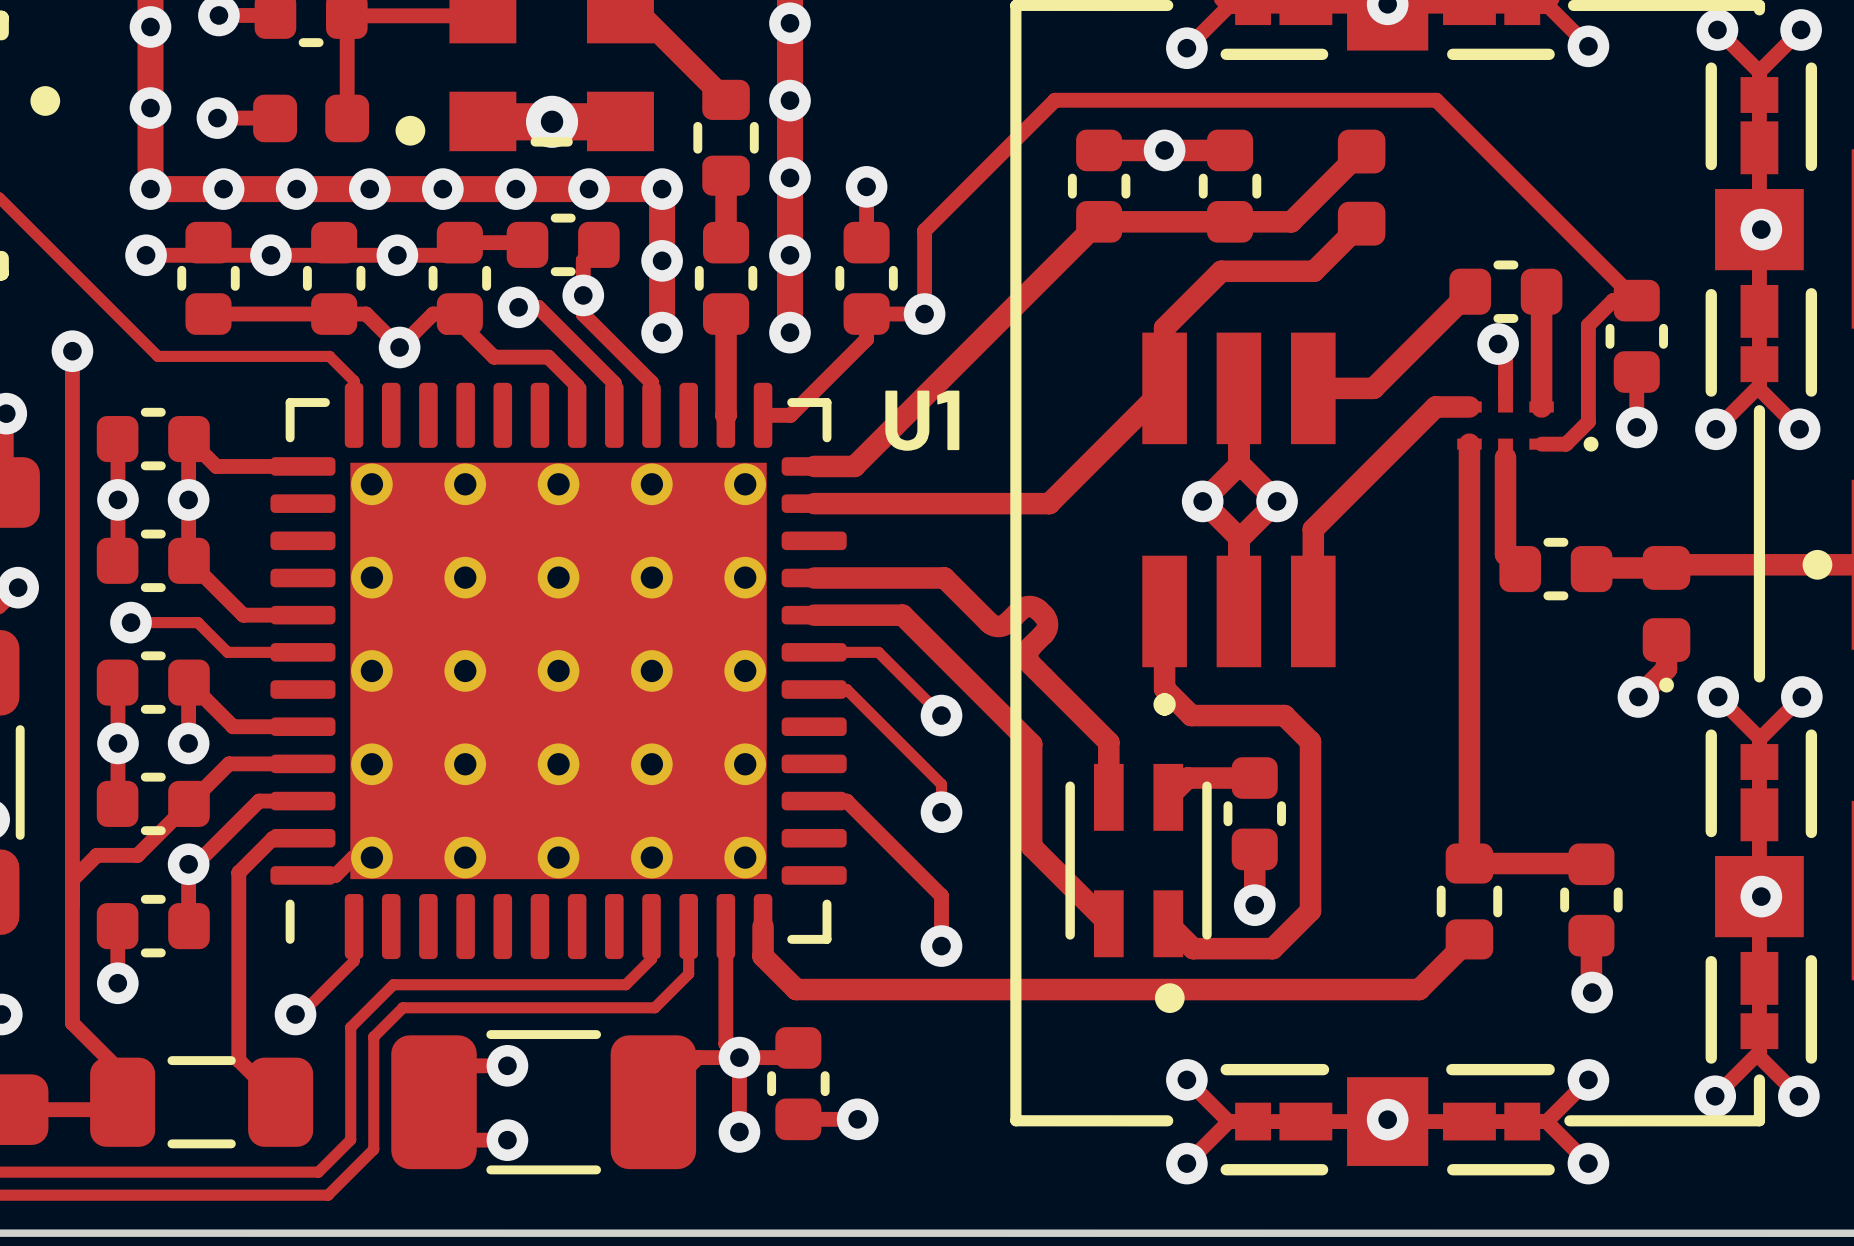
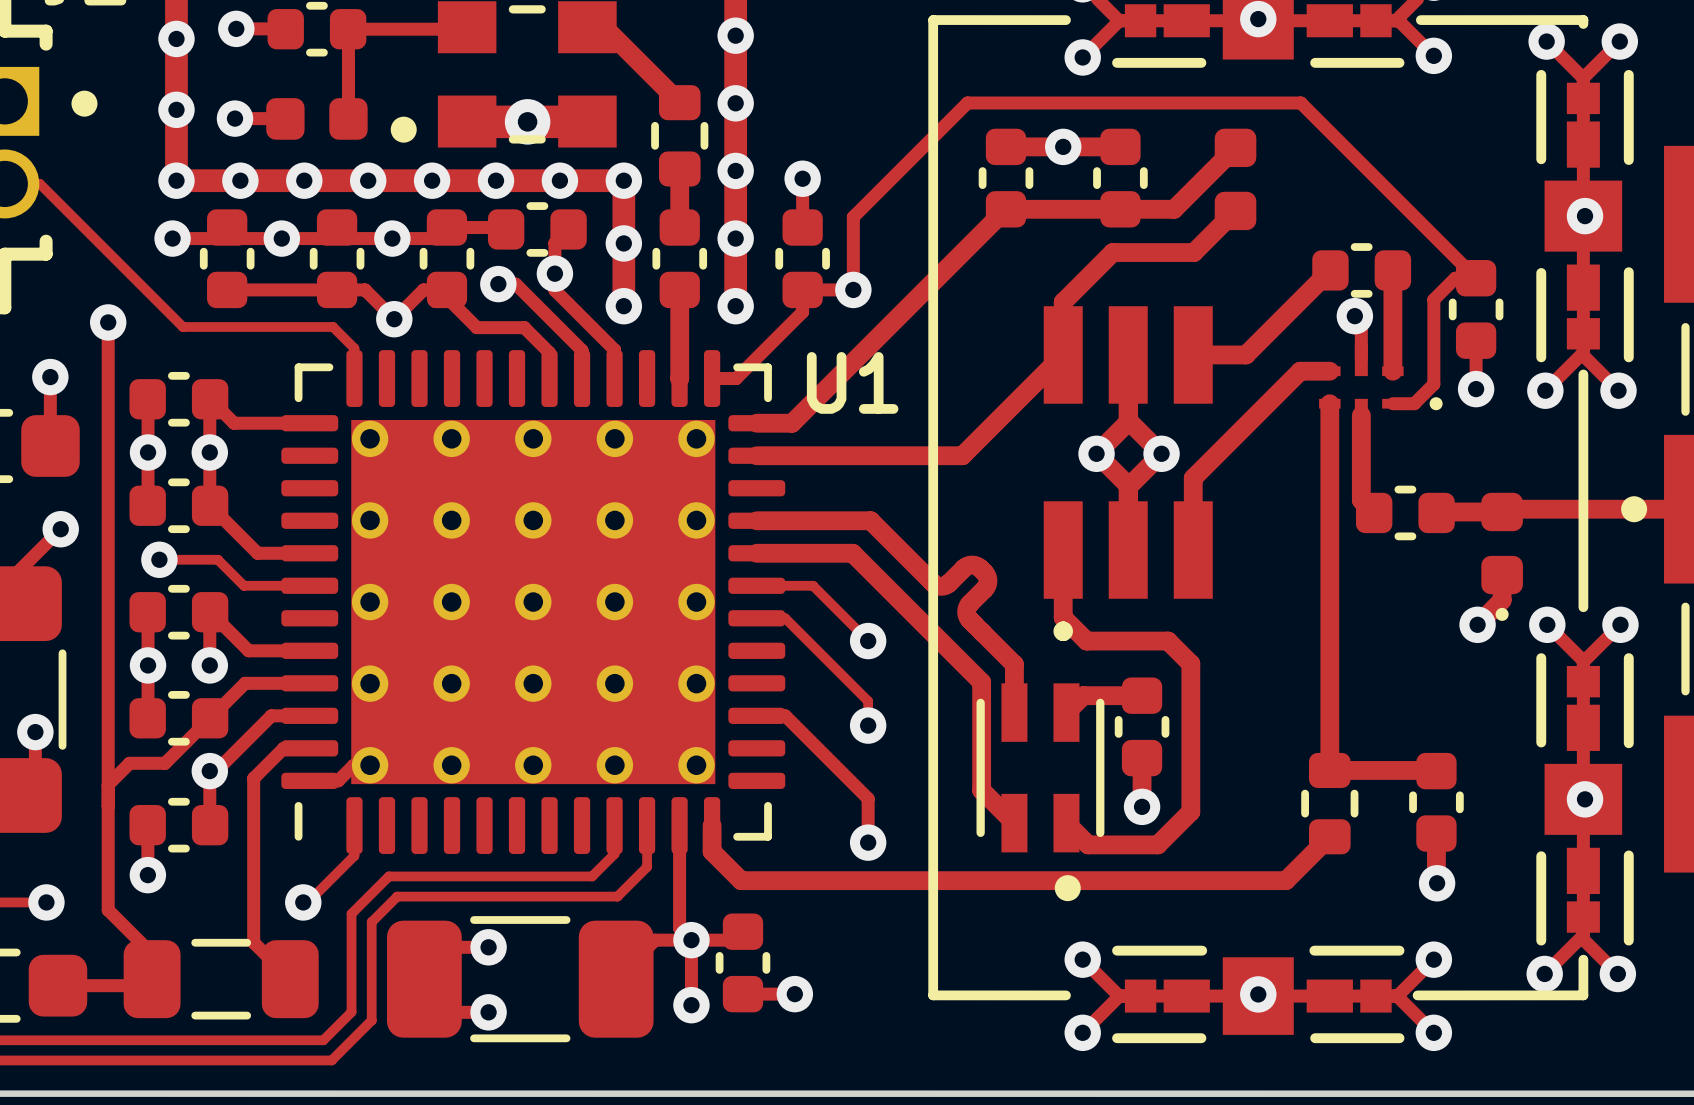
track: (902, 615) (1031, 744) (1031, 846) (1071, 886) -> (834, 553) (852, 553) (981, 682) (981, 790)
track: (989, 622) (994, 625) (1001, 626) (1023, 607) (1030, 606) (1038, 610) (1046, 618) (1047, 627) (1029, 648) (1027, 658) (1031, 665) (1058, 691) -> (909, 559) (932, 582) (938, 586) (947, 584) (968, 565) (977, 566) (984, 572) (987, 578) (986, 585) (967, 607) (966, 614) (970, 620)

